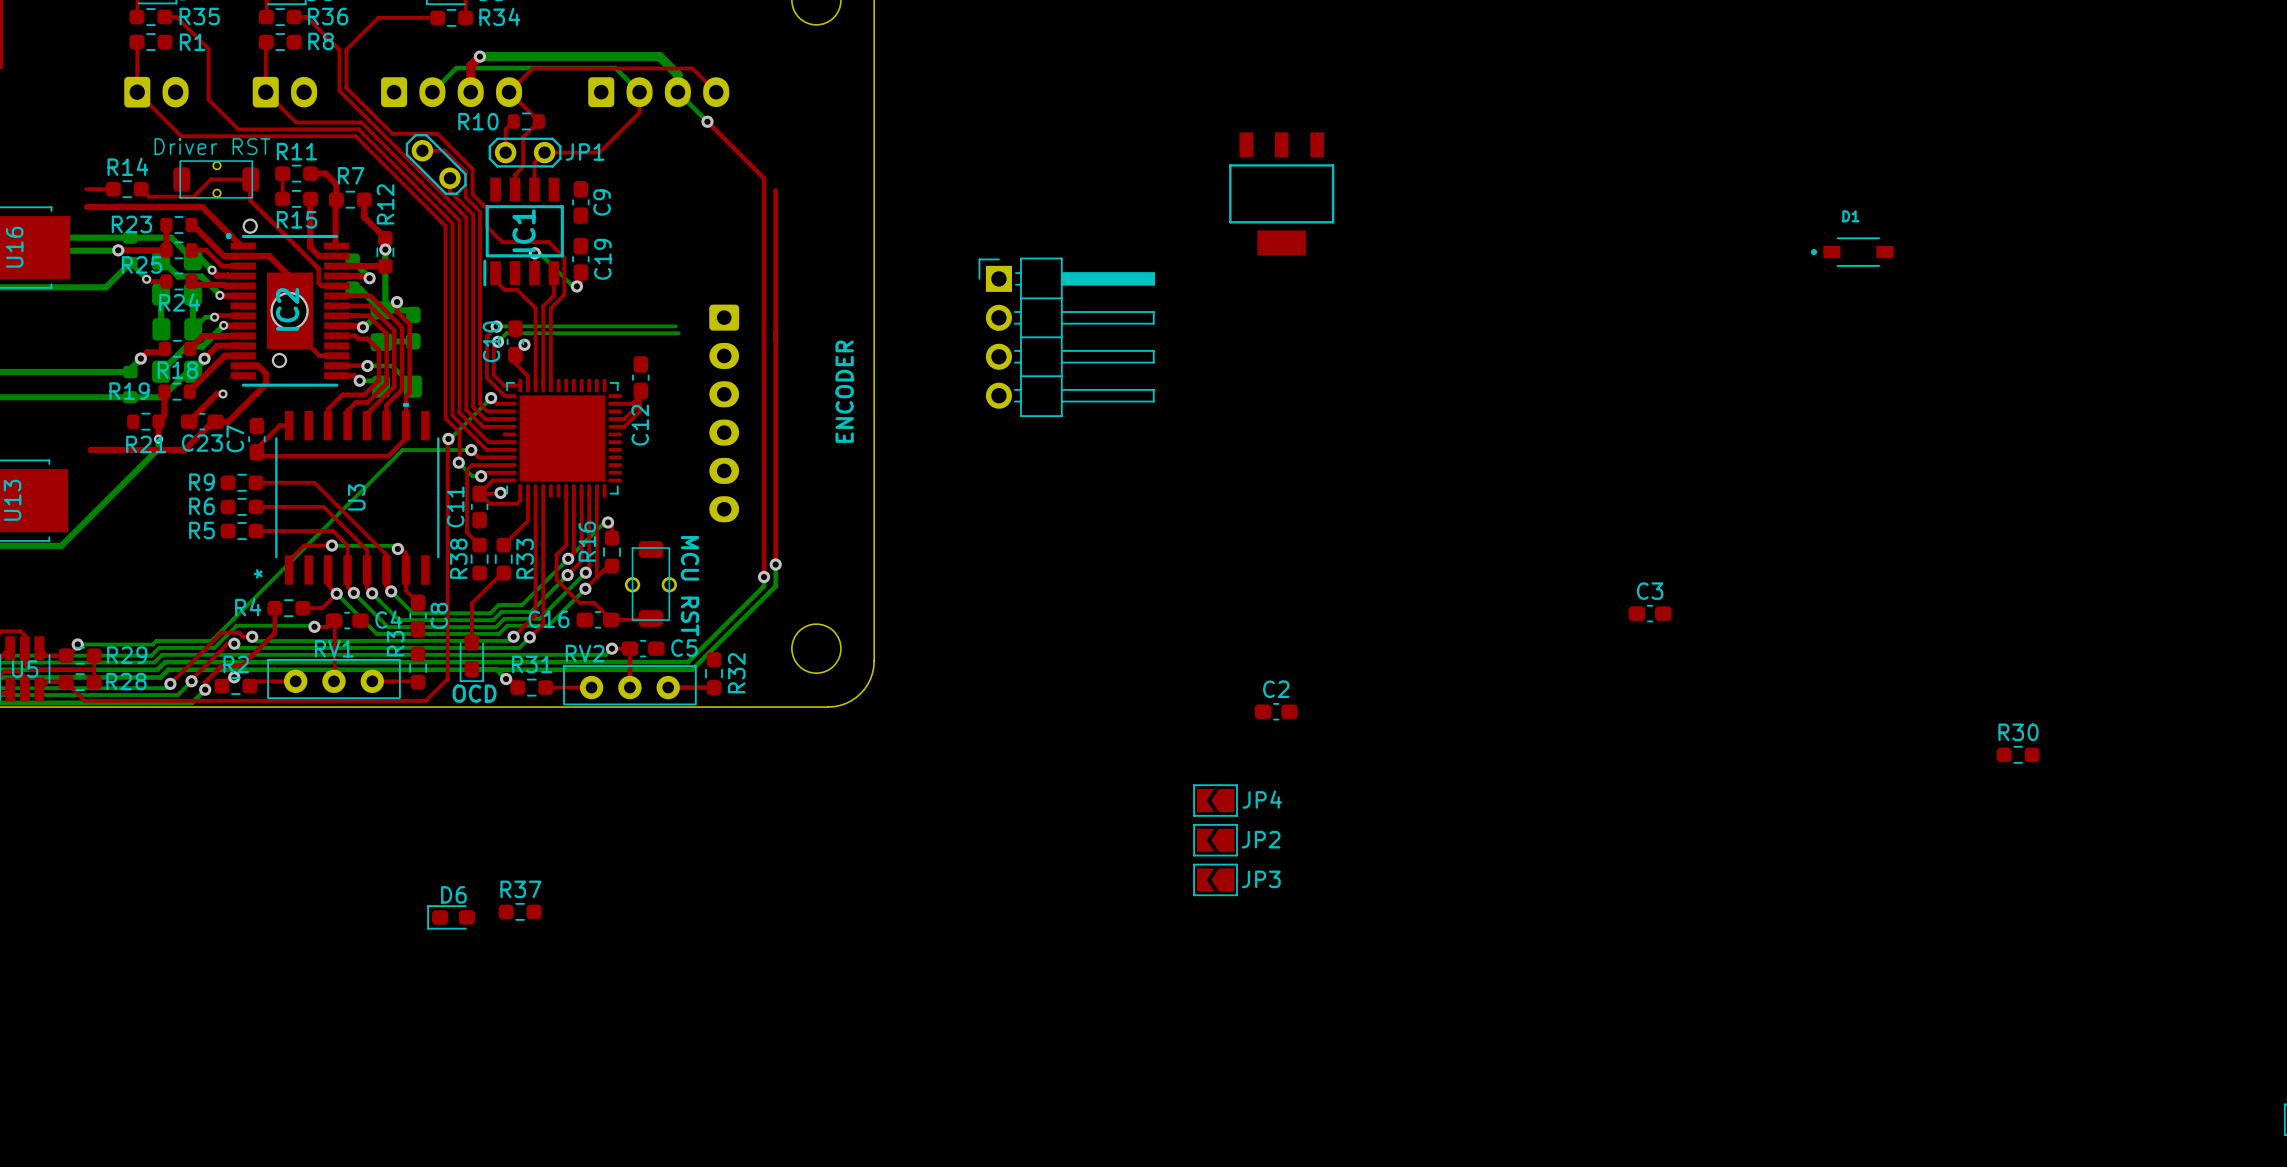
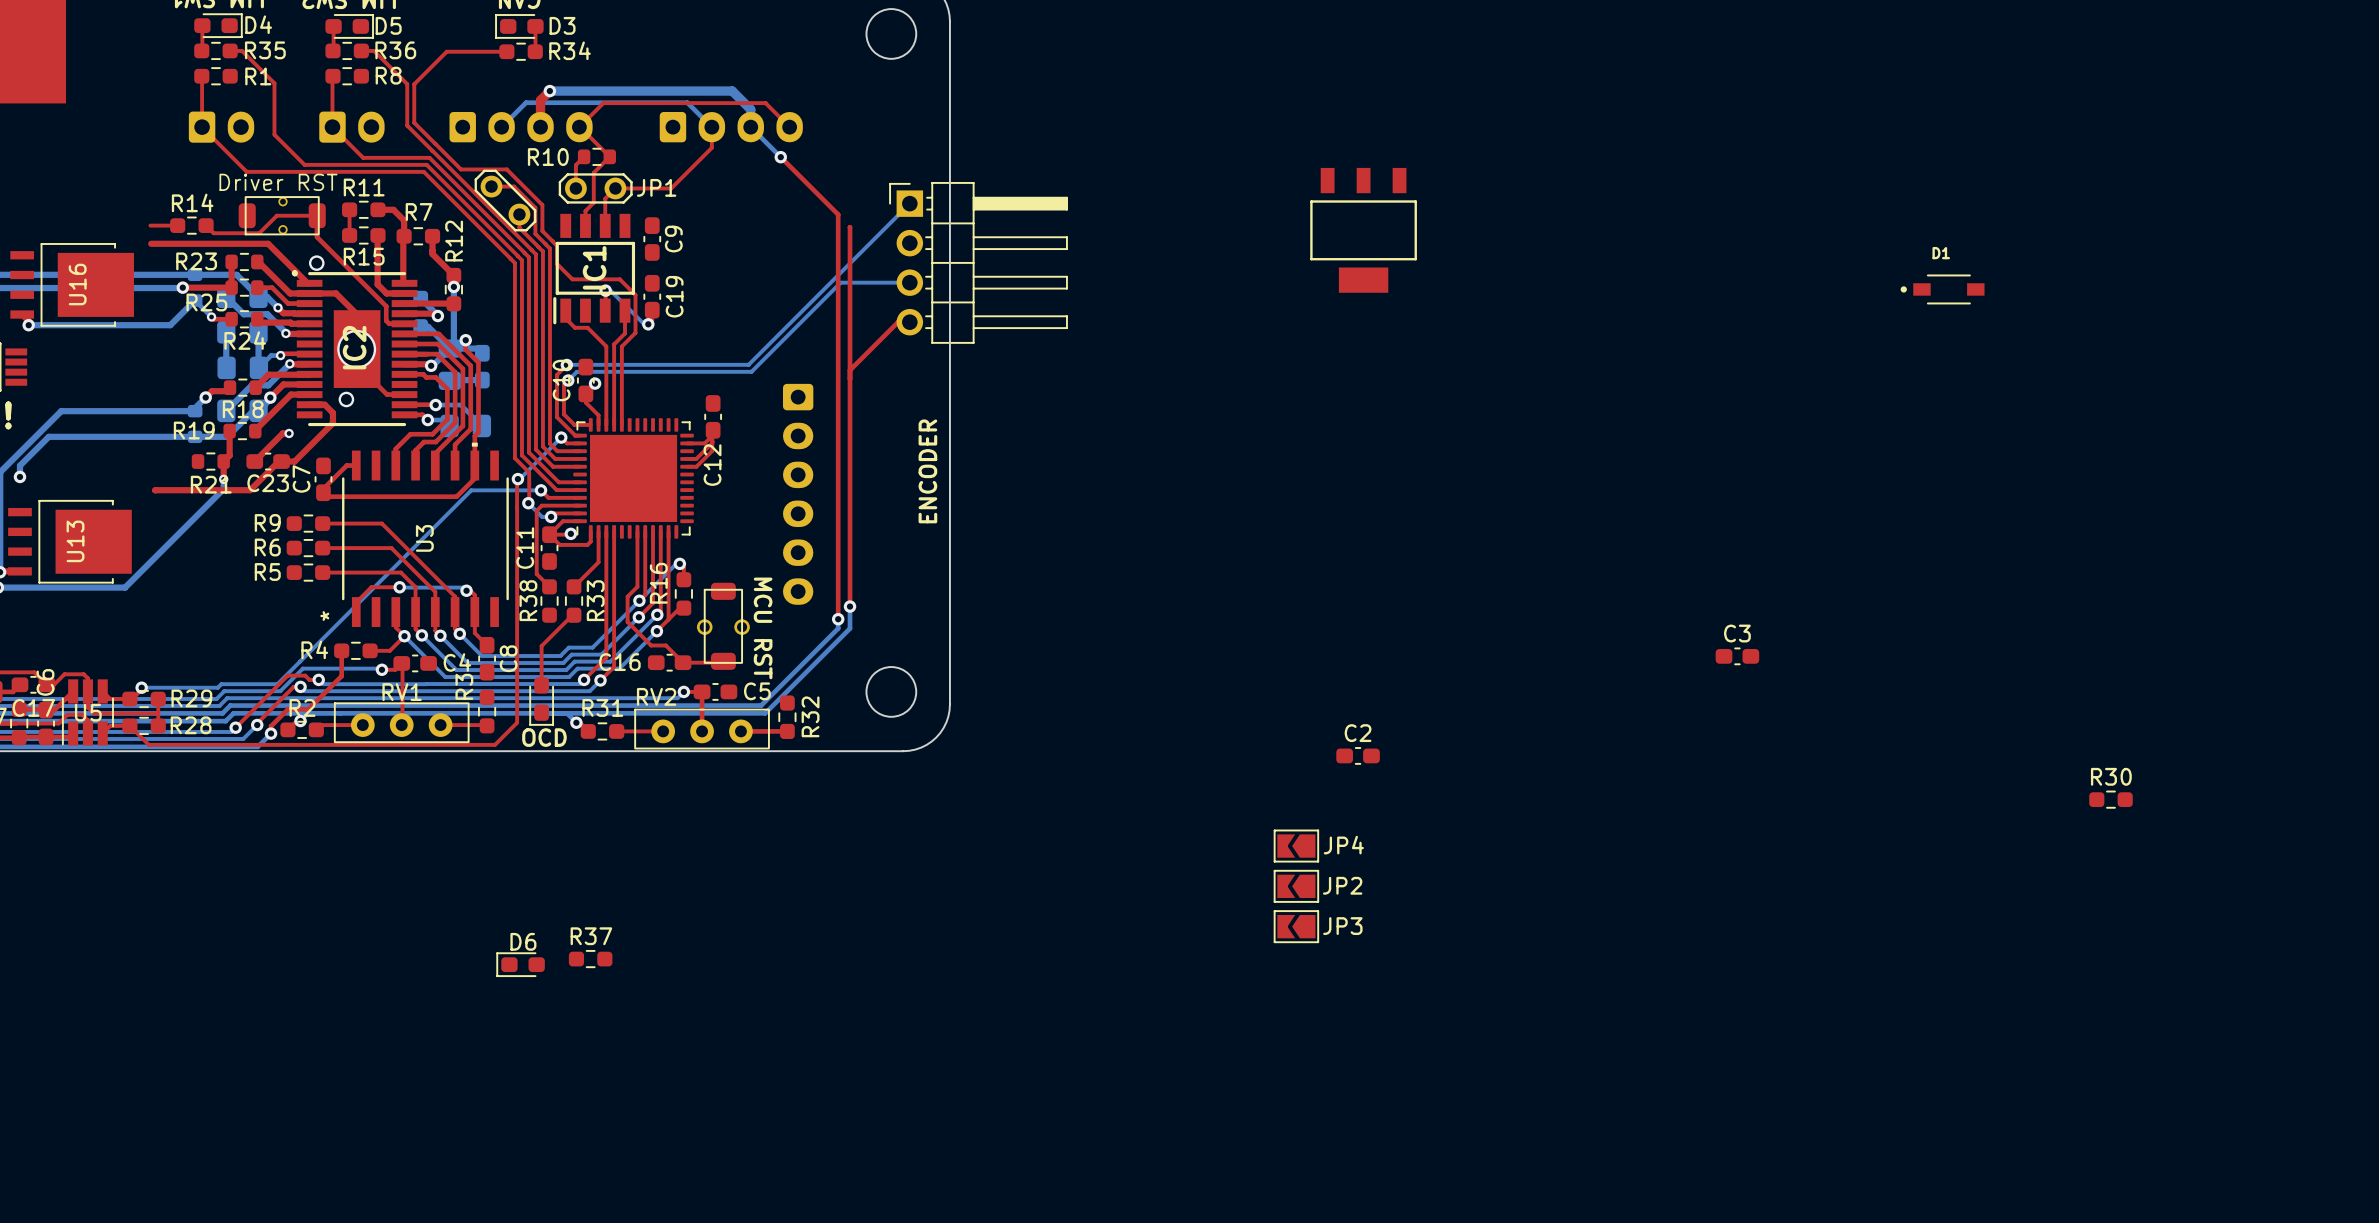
bottom track: none -> (909, 203) (748, 364)
bottom track: none -> (909, 282) (840, 282) (751, 371)
top track: none -> (909, 322) (898, 322) (850, 370)
part position: (1066, 337) -> (978, 262)
text position: ENCODER (844, 391) -> ENCODER (927, 471)
part position: (724, 413) -> (798, 494)

